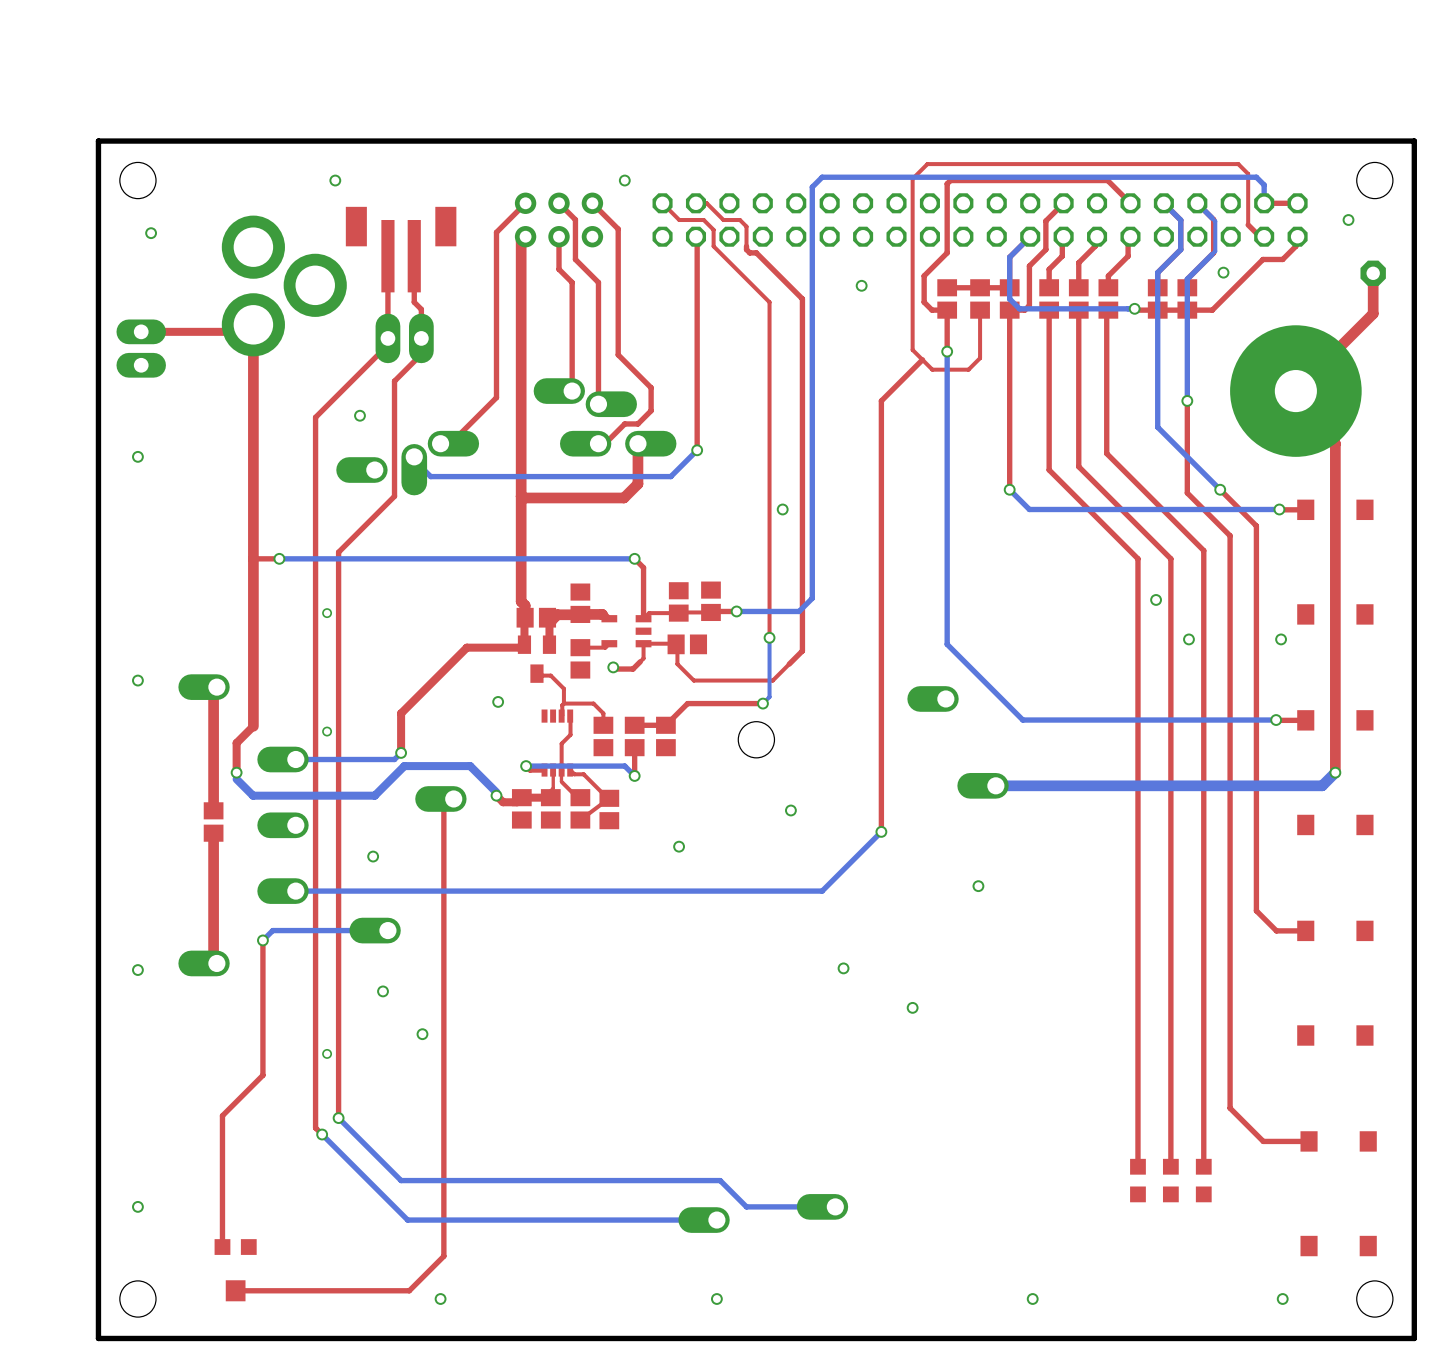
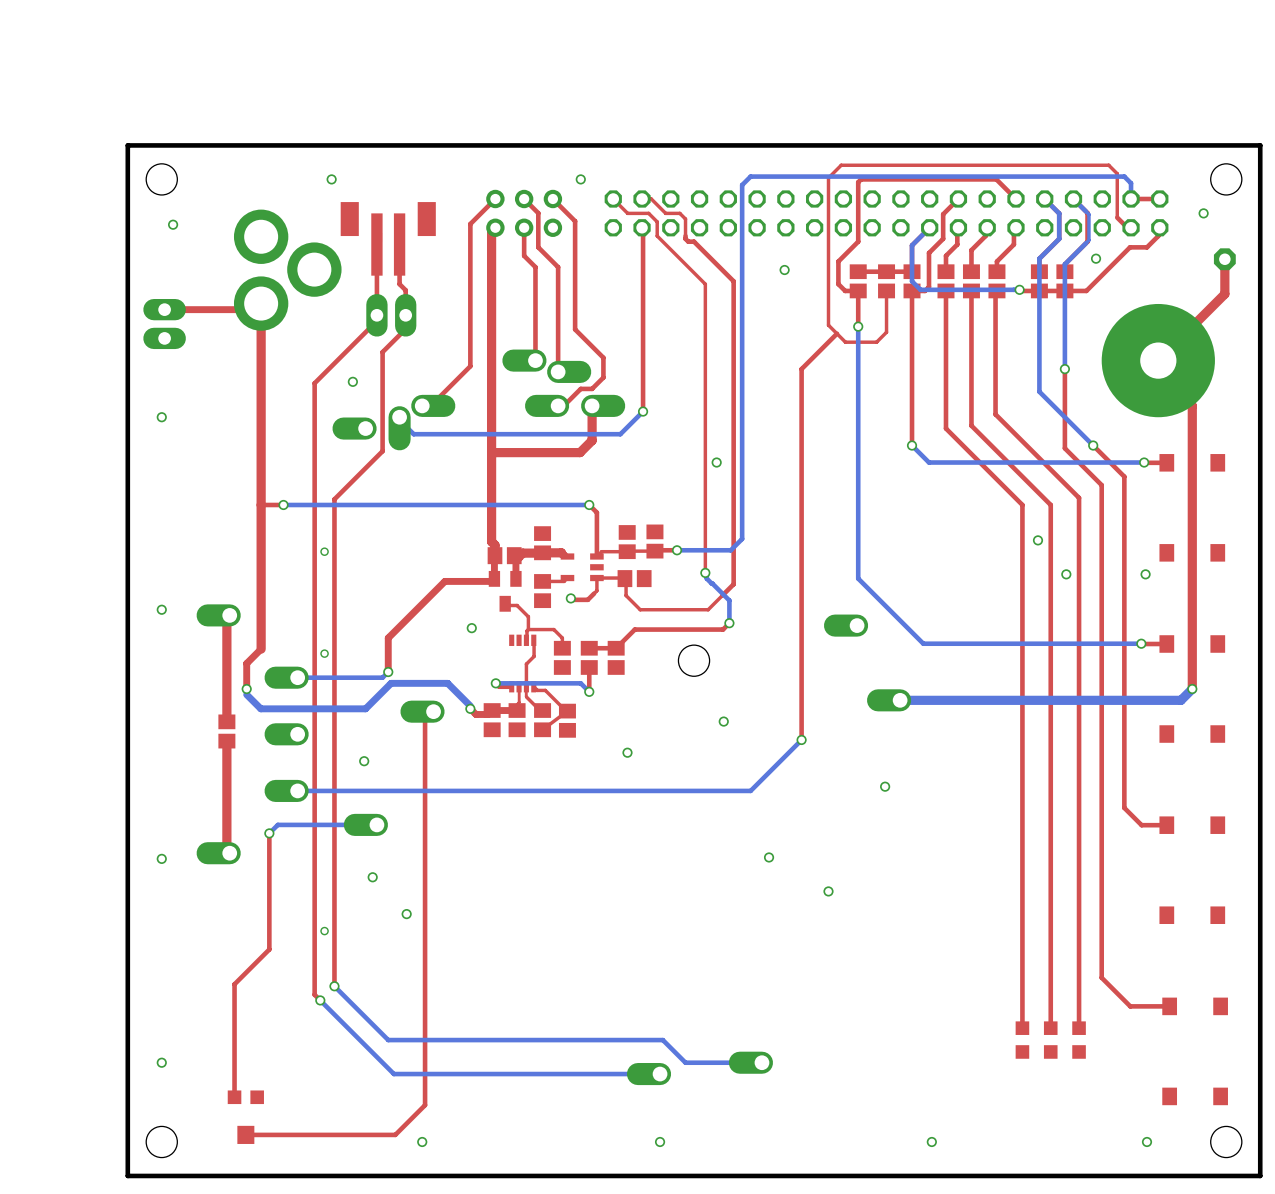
bottom track: (769, 637) (769, 697) (762, 703) -> (705, 572) (706, 578) (729, 600) (729, 623)
top track: none -> (729, 623) (723, 629) (699, 629)
via position: (762, 703) -> (729, 623)

